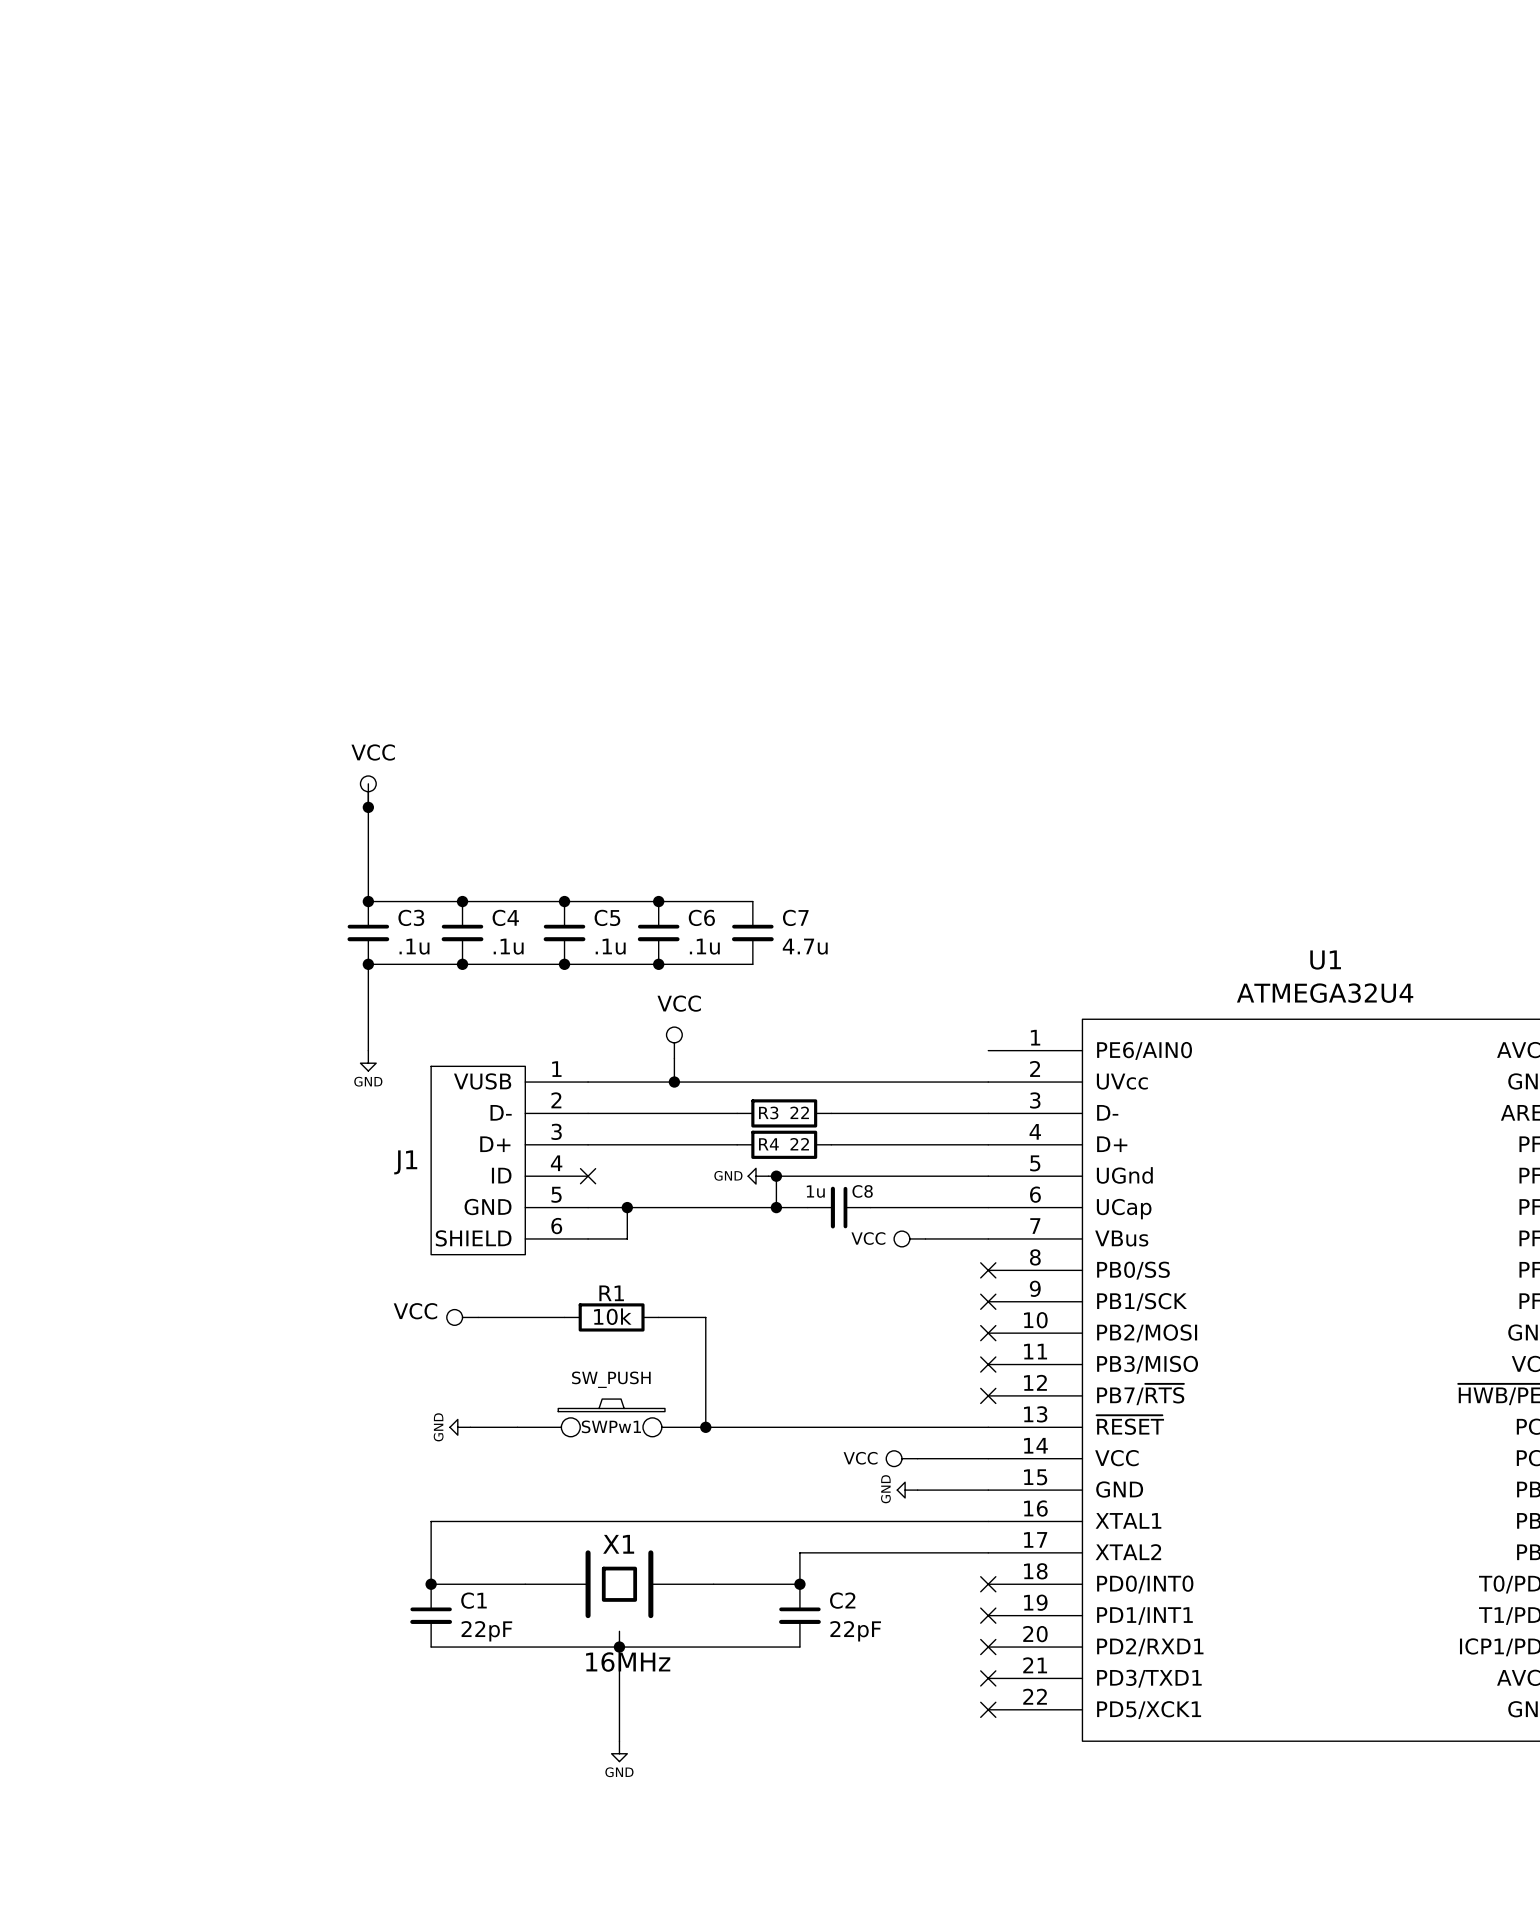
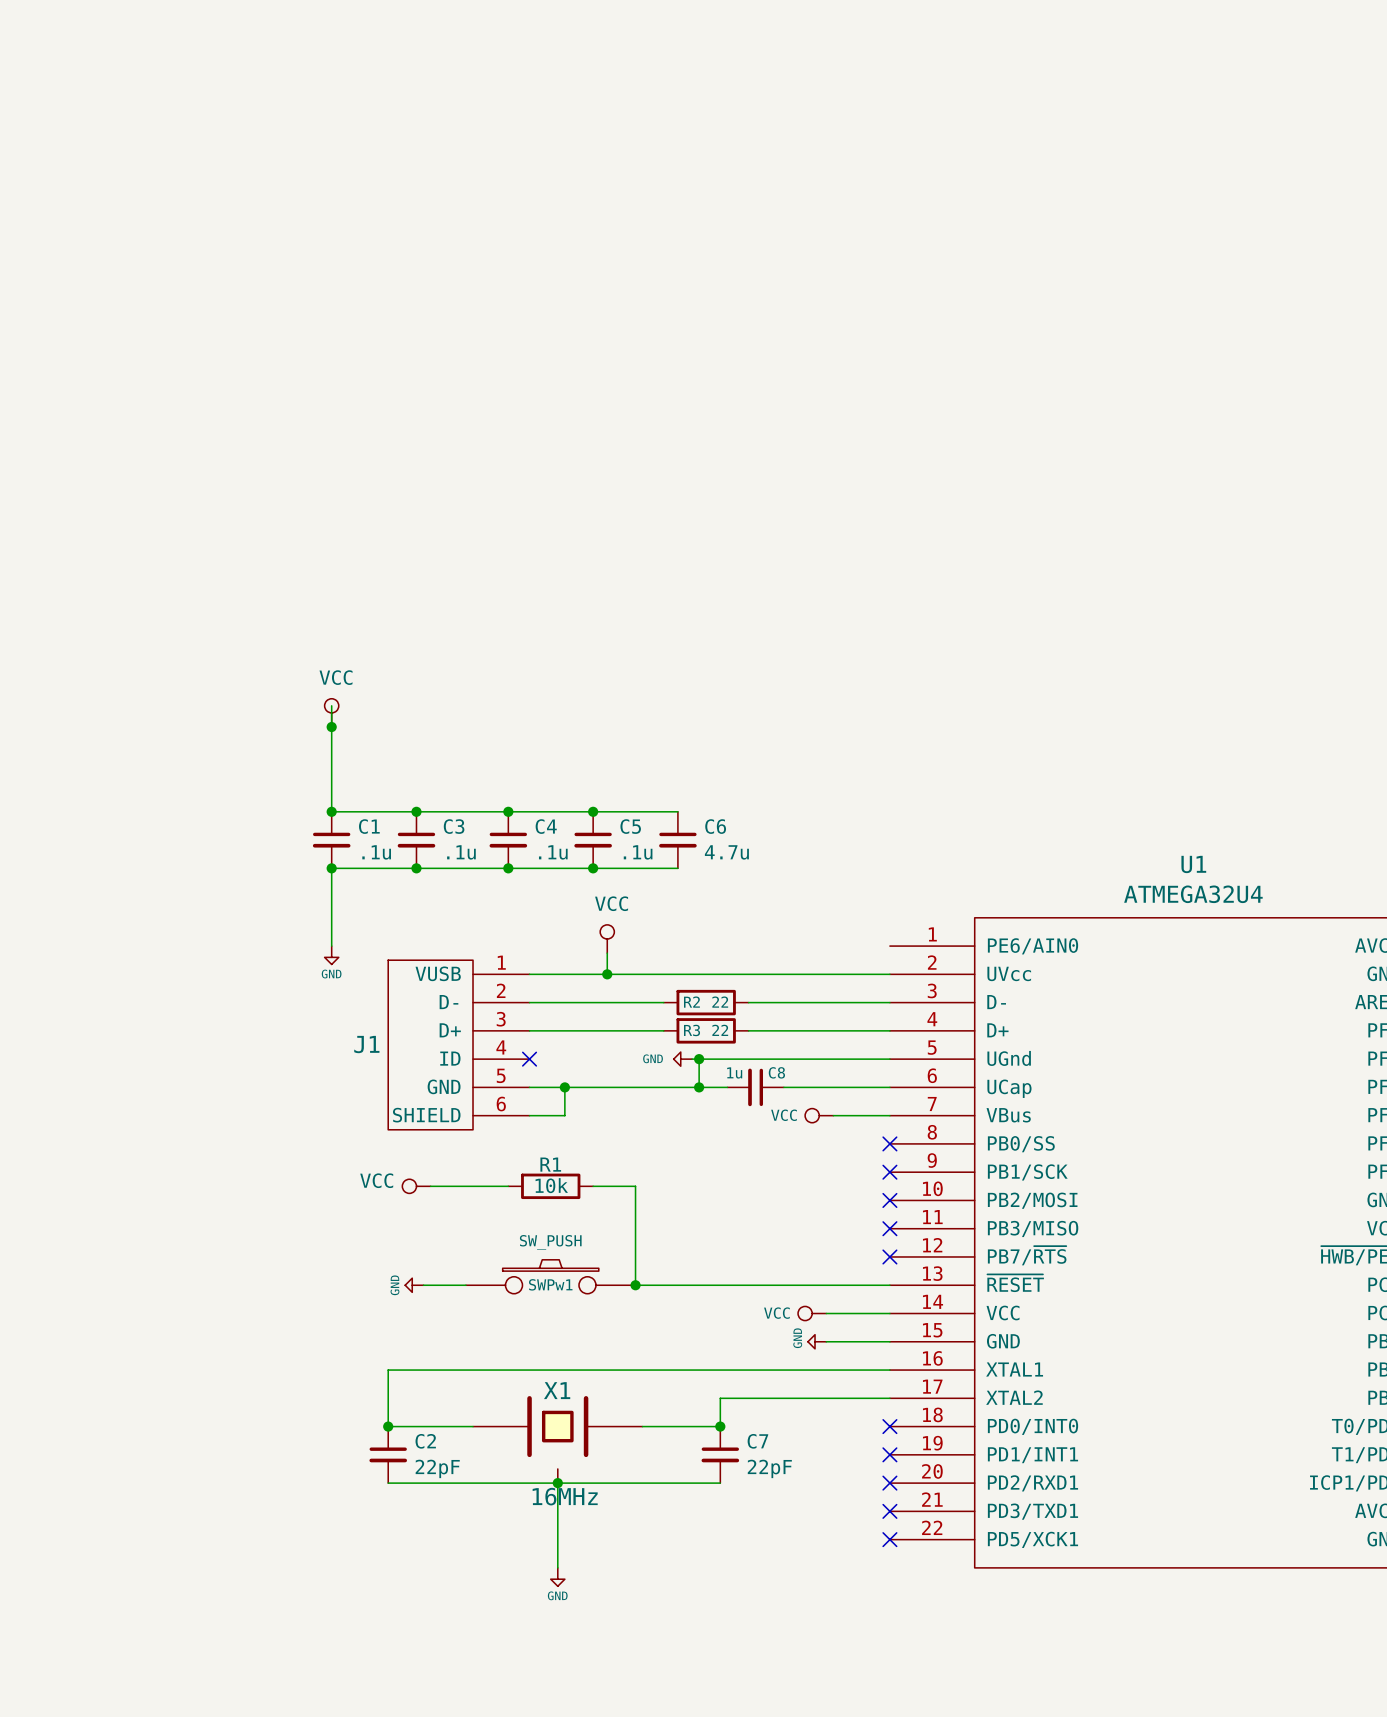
C3 name: C3 (411, 917) -> C1 (369, 826)
C4 name: C4 (505, 917) -> C3 (454, 826)
C5 name: C5 (607, 917) -> C4 (546, 826)
C6 name: C6 (701, 917) -> C5 (630, 826)
C7 name: C7 (795, 917) -> C6 (715, 826)
R3 name: R3 (768, 1112) -> R2 (691, 1002)
R4 name: R4 (768, 1144) -> R3 (692, 1030)
C1 name: C1 (473, 1600) -> C2 (425, 1441)
C2 name: C2 (842, 1600) -> C7 (757, 1441)

